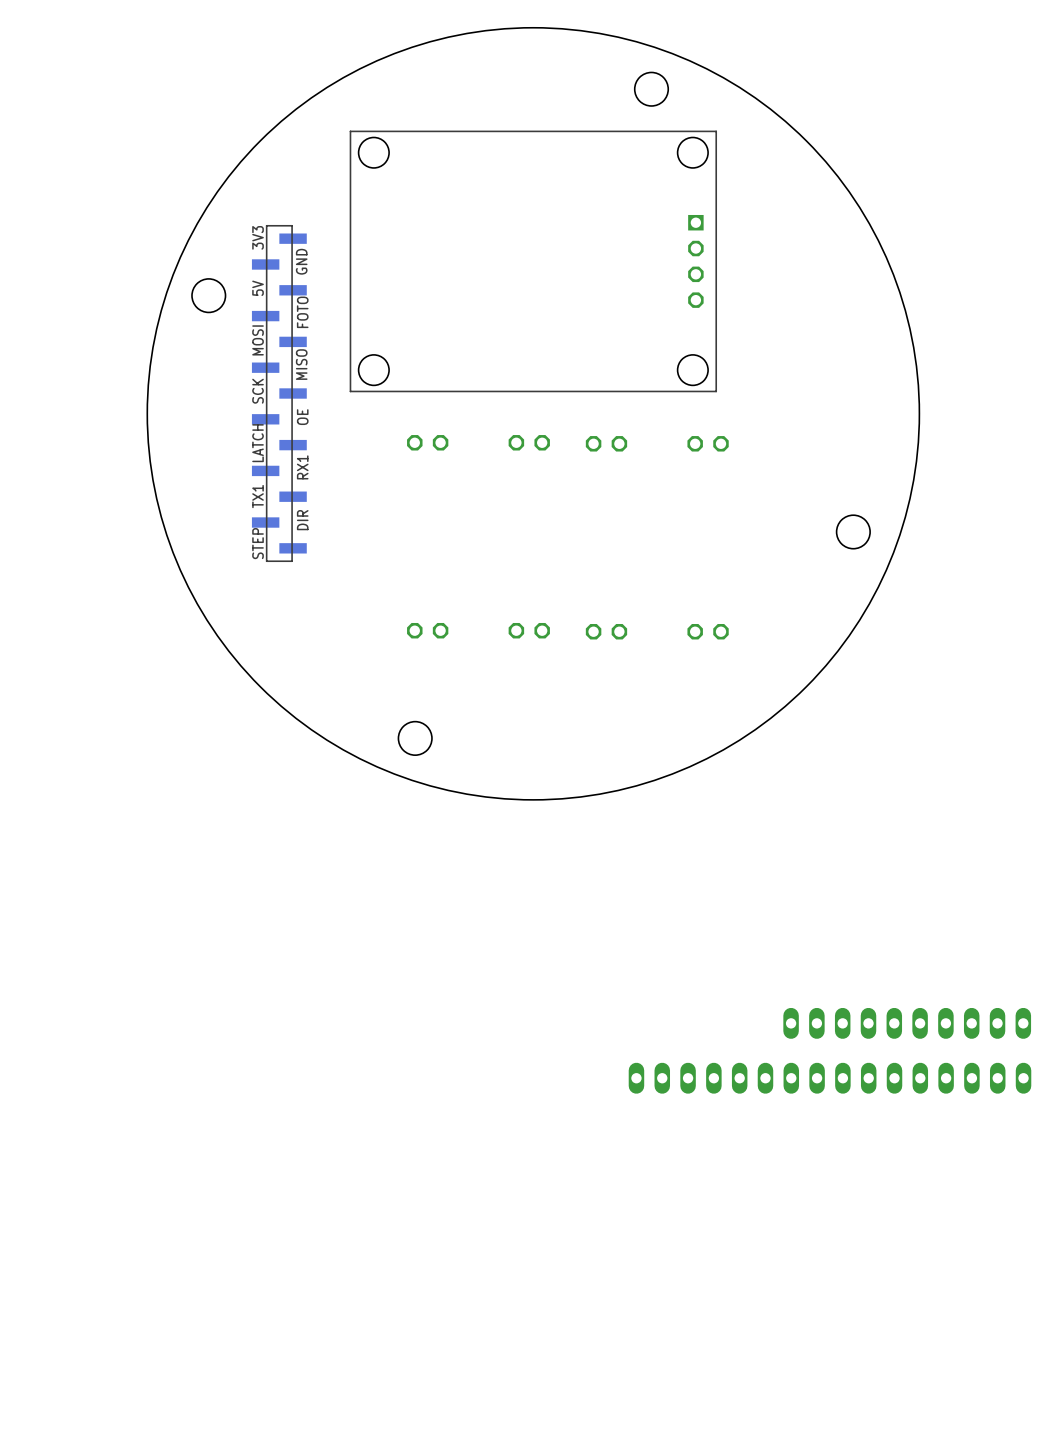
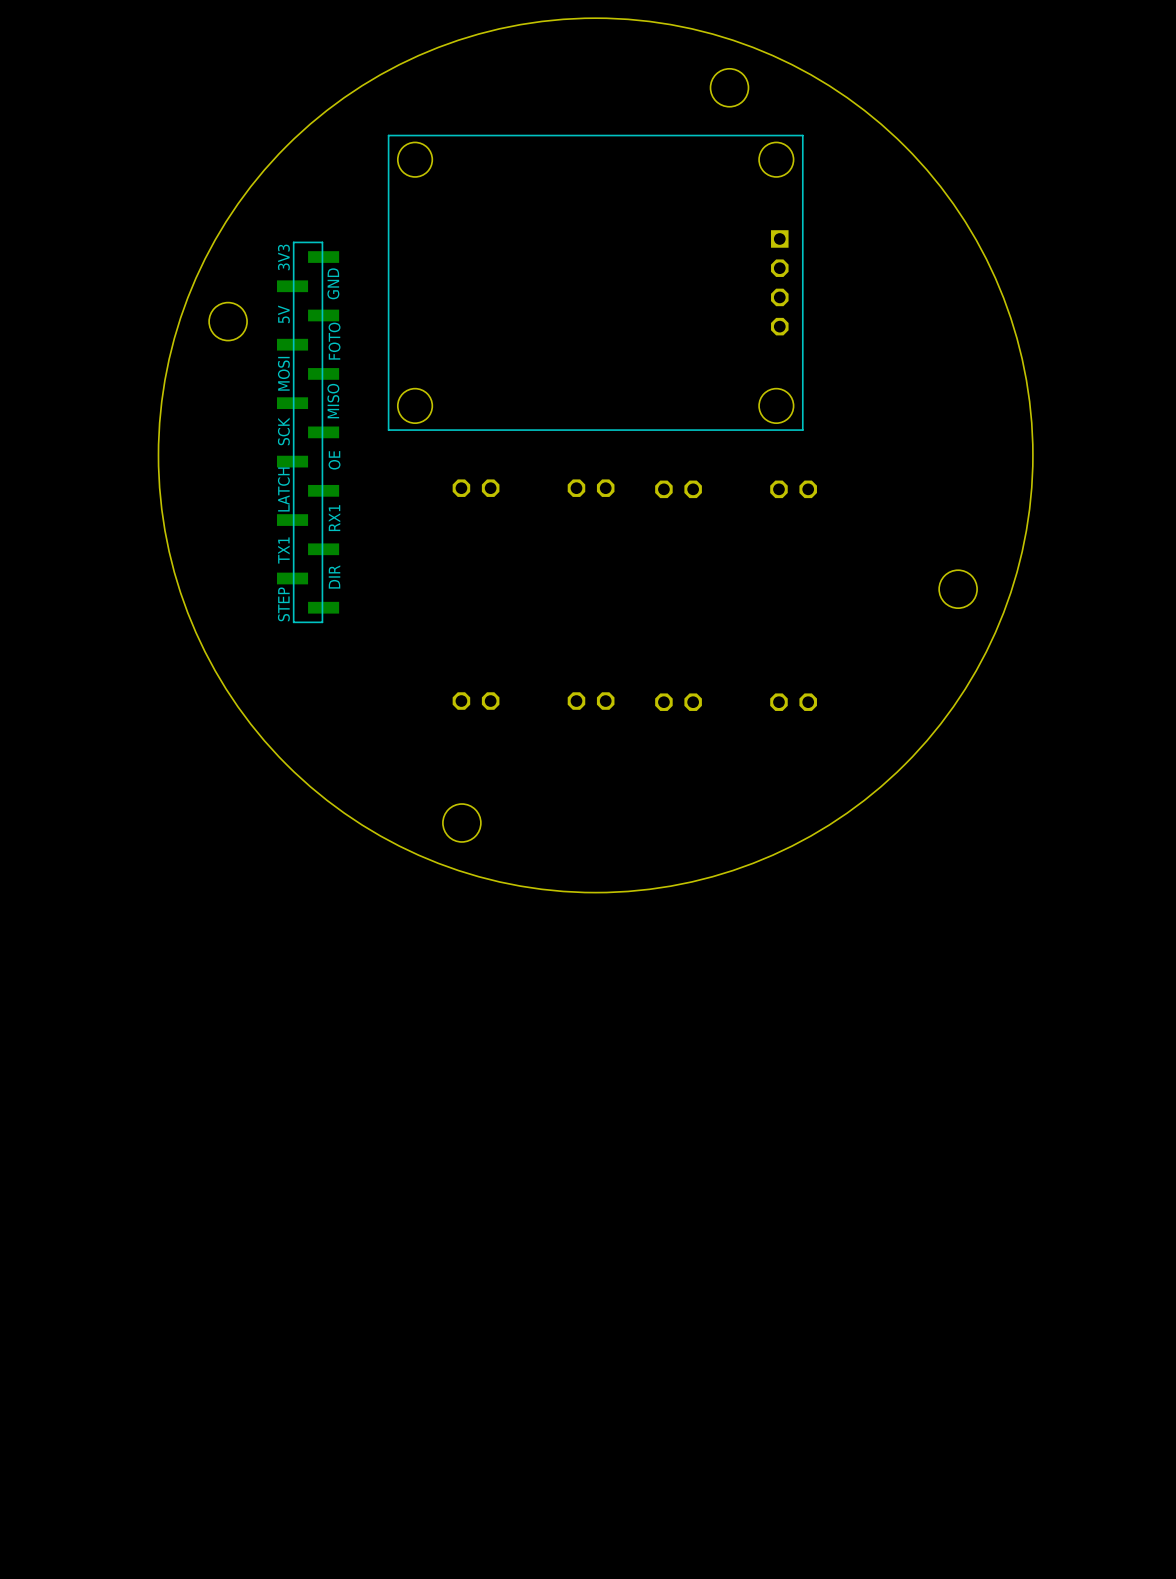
part: (907, 1023) -> none
part: (829, 1078) -> none

